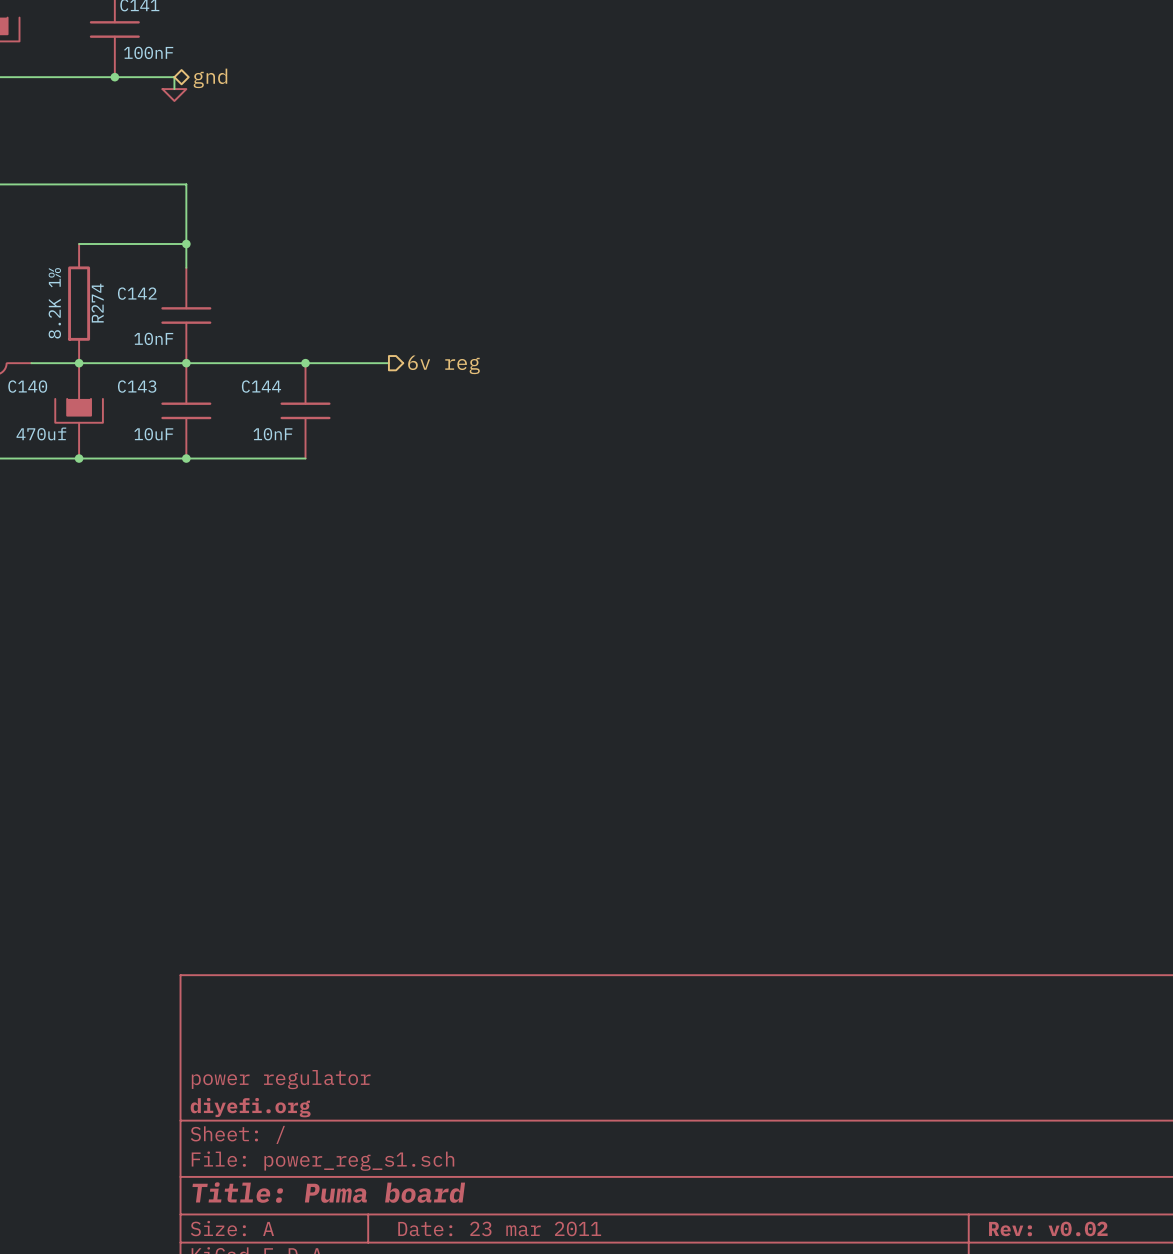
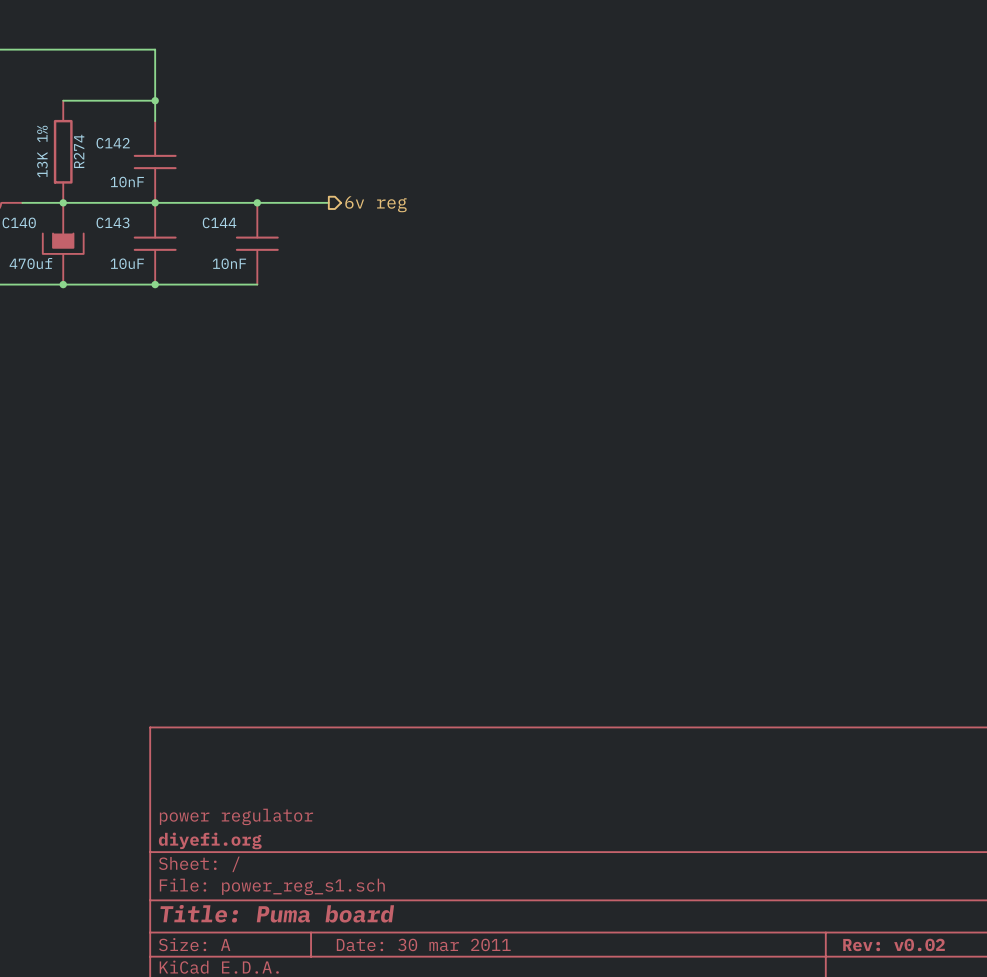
R274 value: 8.2K 1% (54, 303) -> 13K 1% (42, 151)
title block: Date: 23 mar 2011 (499, 1228) -> Date: 30 mar 2011 (423, 944)

